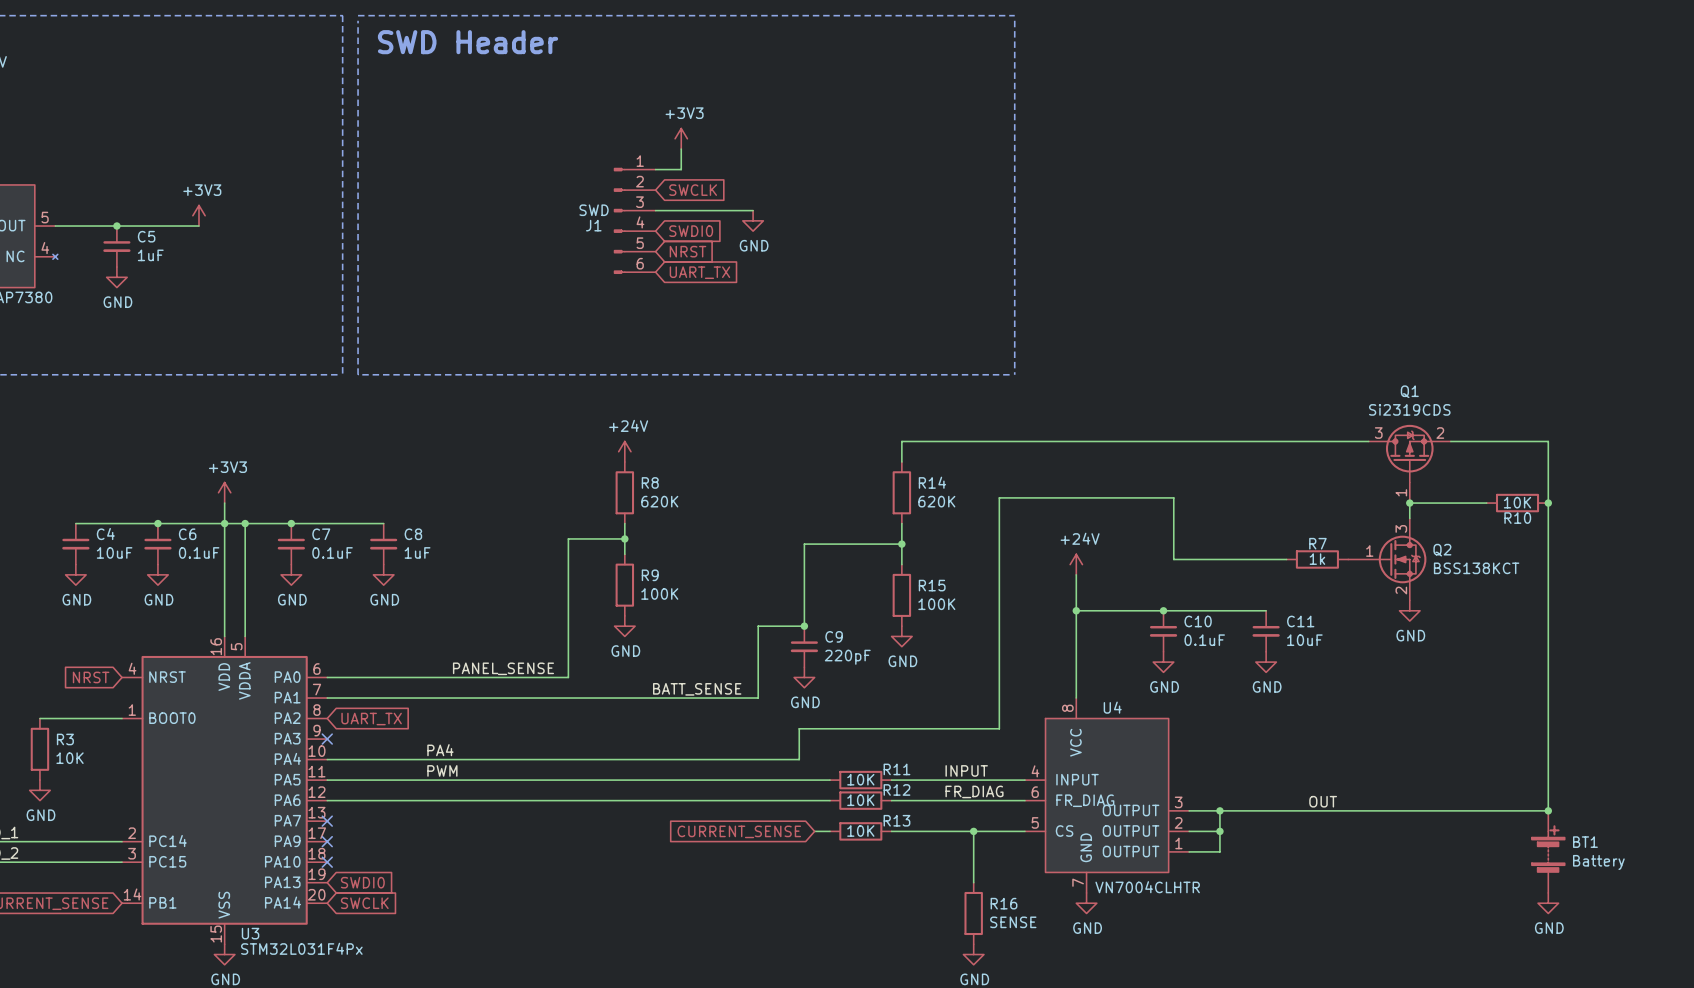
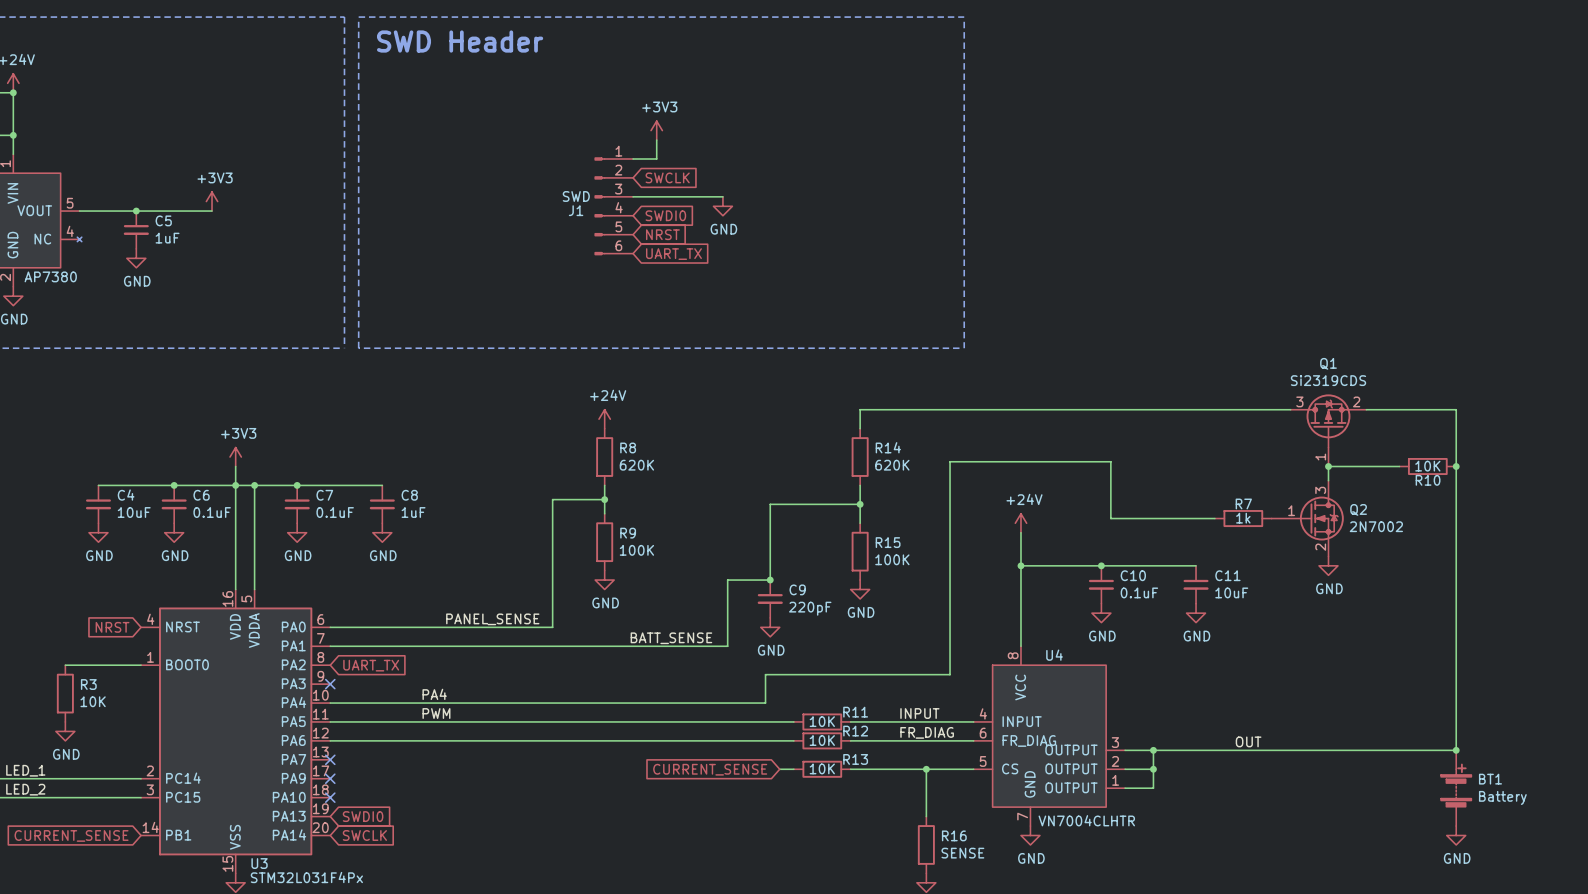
Q2 value: BSS138KCT (1476, 568) -> 2N7002 (1376, 526)

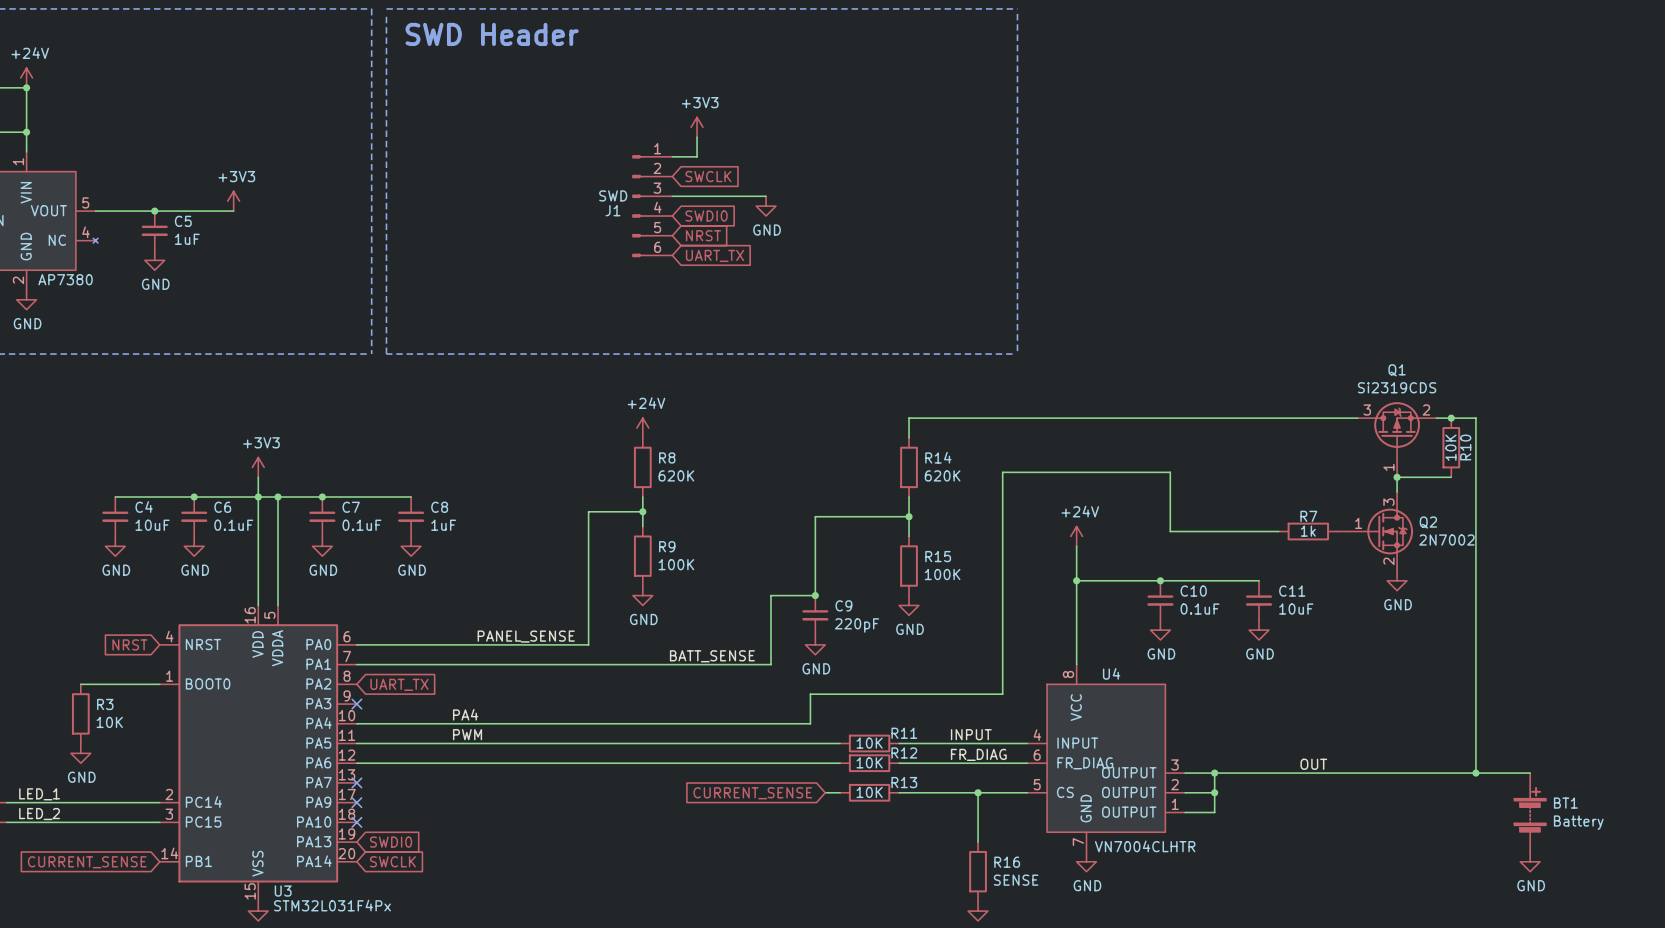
junction: none -> (1451, 418)
wire: (1404, 409) (1456, 409) (1456, 750) -> (1475, 418) (1475, 773)
wire: (1380, 466) (1399, 466) -> none
R10 rotation: 0° (1427, 466) -> 90° clockwise (1451, 447)
R10 position: (1427, 466) -> (1451, 447)
junction: (1456, 466) -> none
R10 name position: R10 (1428, 480) -> R10 (1465, 447)
junction: none -> (1475, 773)
junction: (1456, 750) -> none

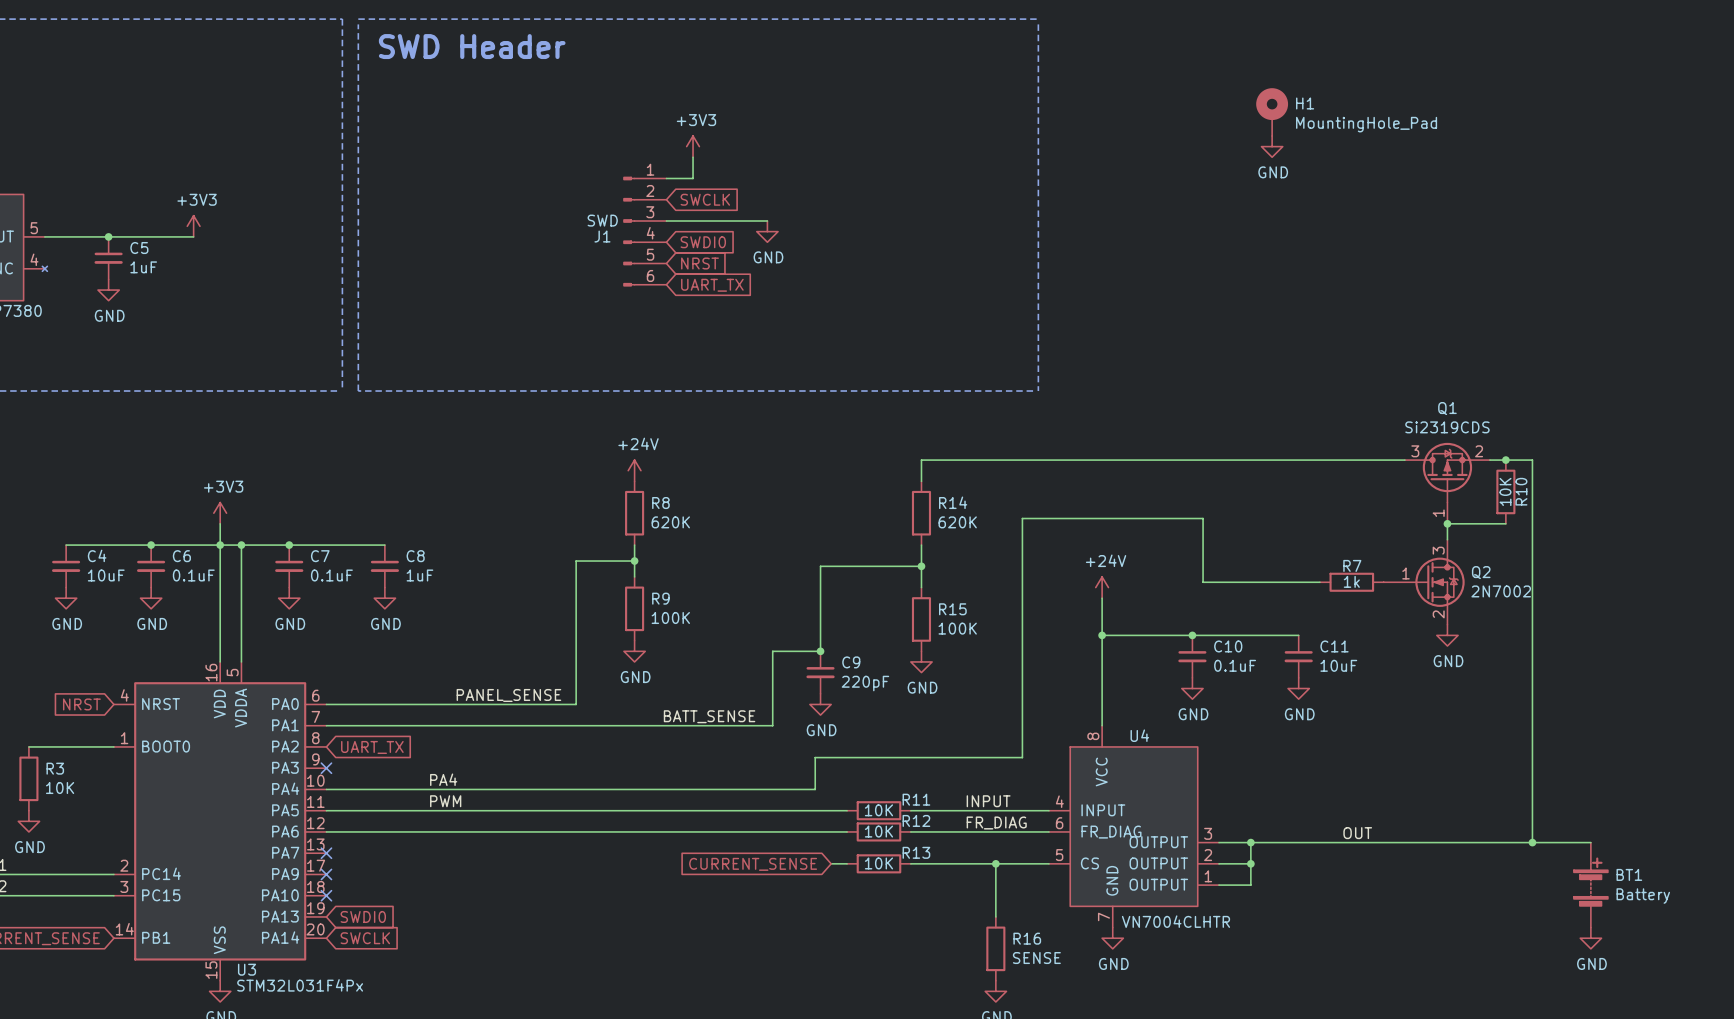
H1: none -> MountingHole_Pad (1272, 112)
power symbol: none -> GND (1272, 146)

